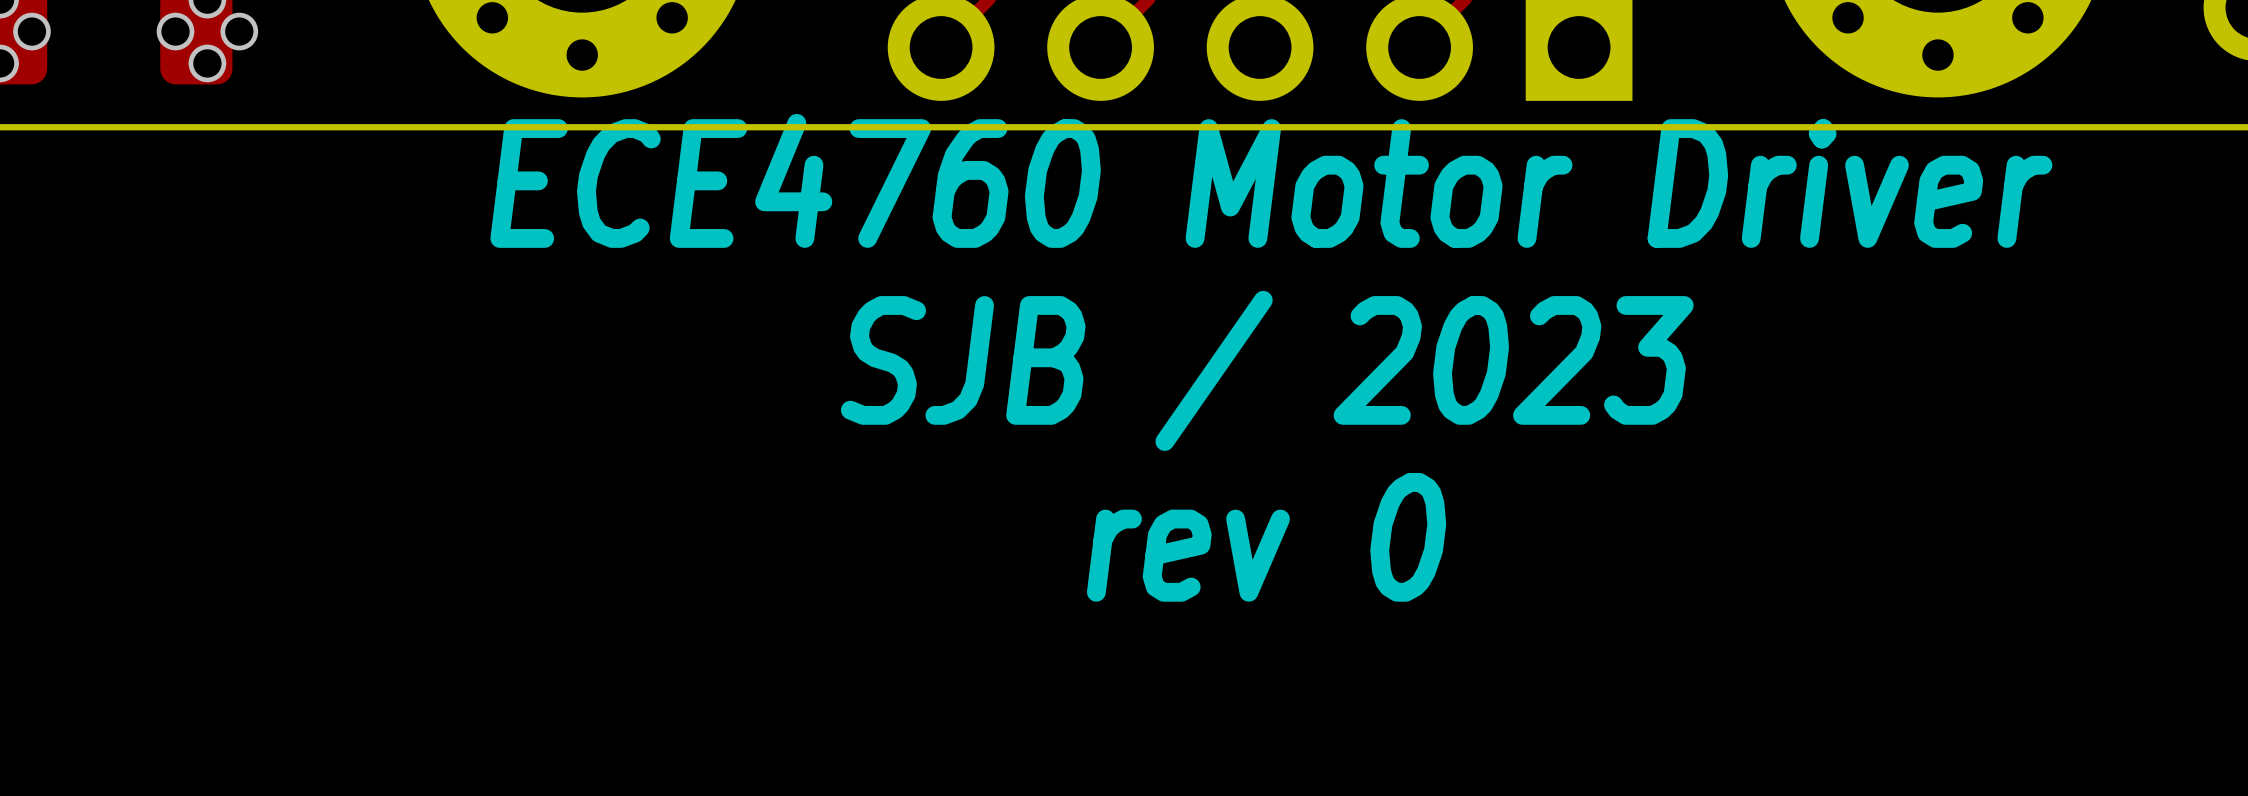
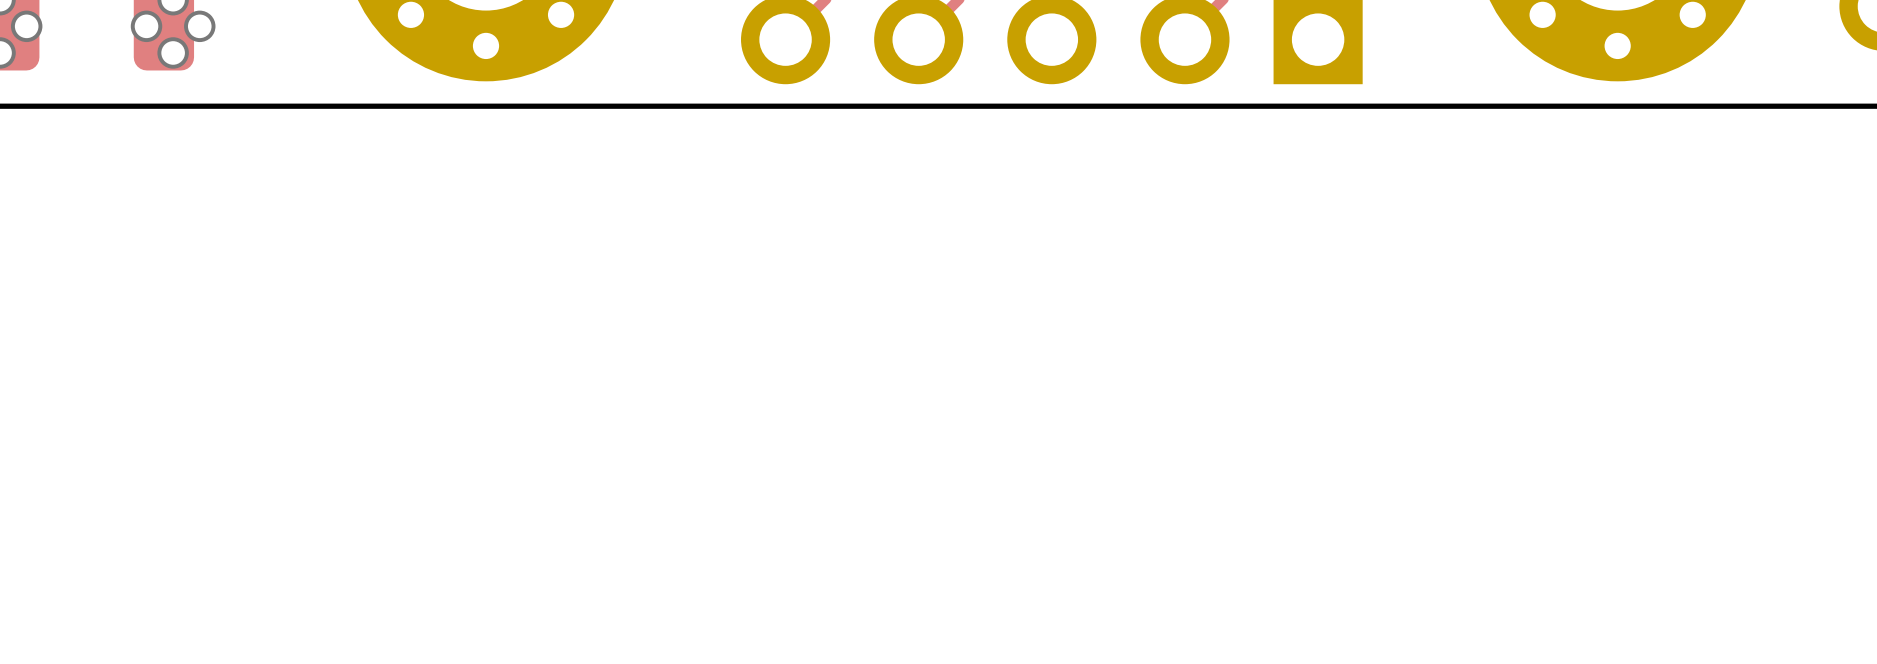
text: ECE4760 Motor Driver (1271, 180) -> none
text: SJB / 2023 (1267, 370) -> none
text: rev 0 (1266, 537) -> none

